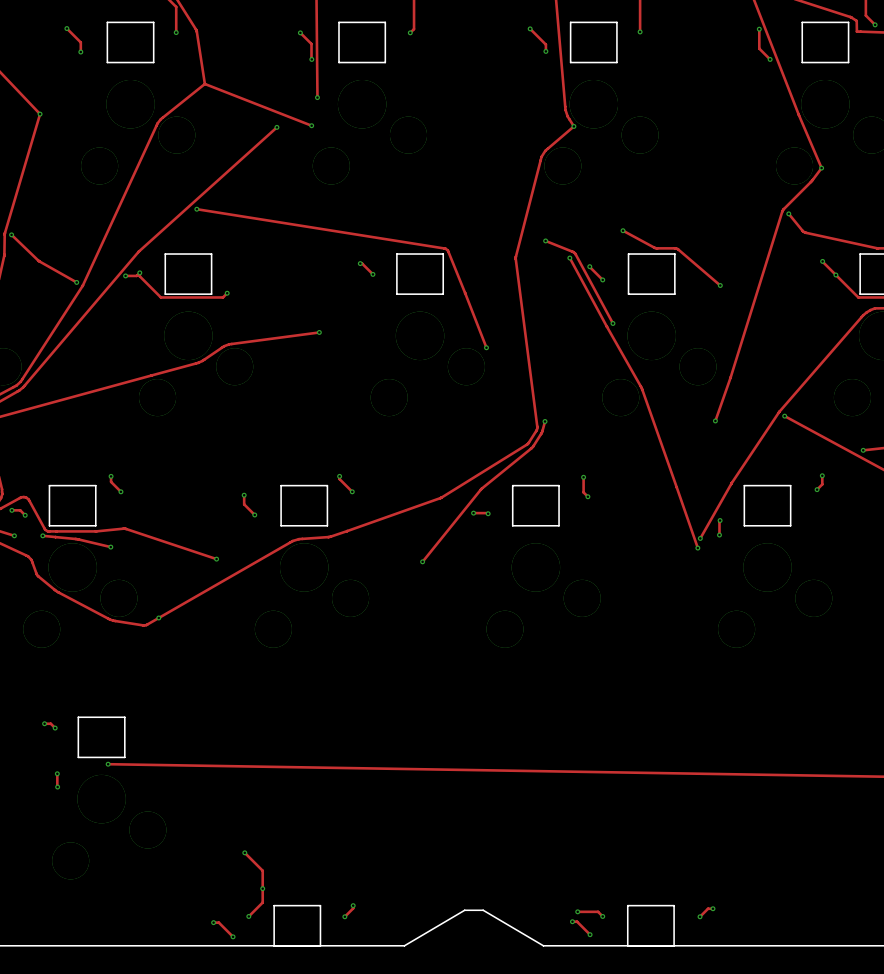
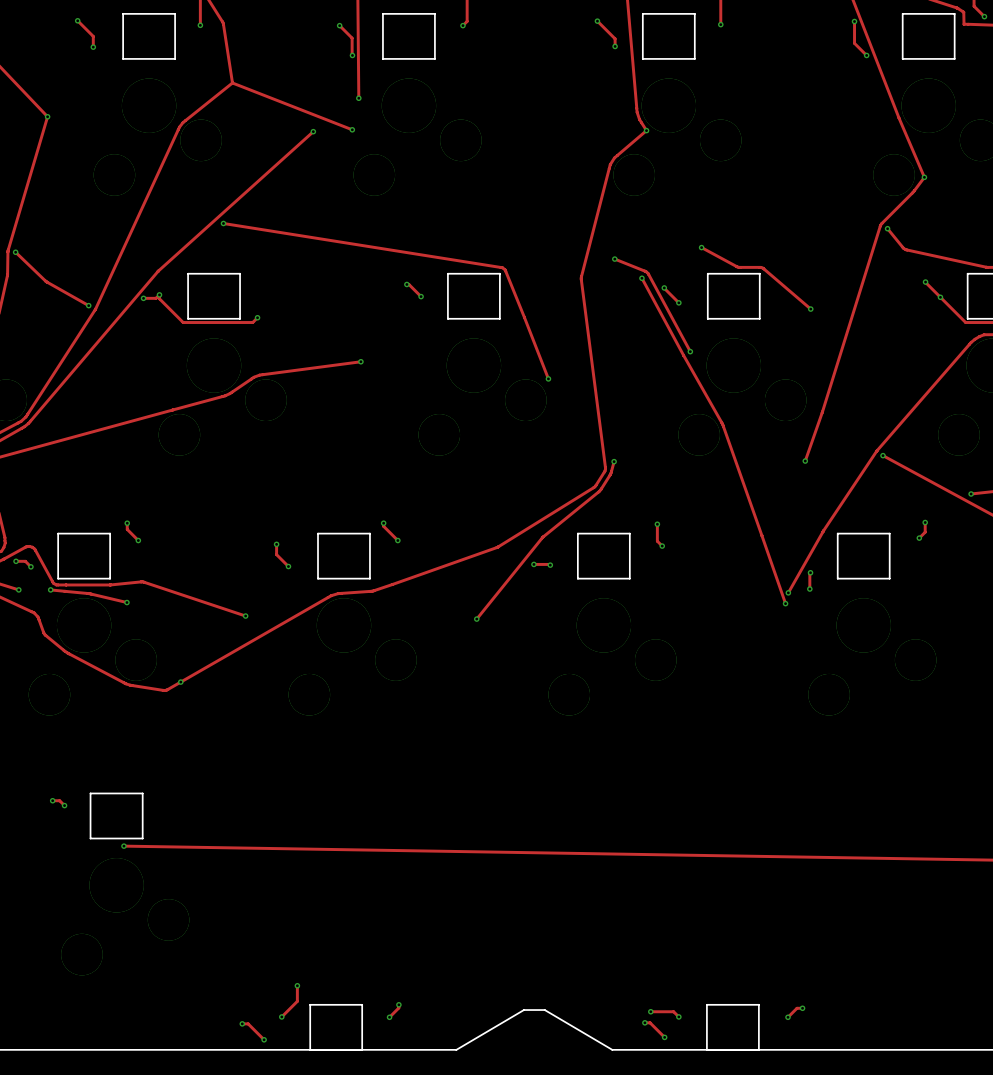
track: (57, 773) (57, 787) -> none
via: (57, 773) -> none
via: (57, 787) -> none
track: (244, 852) (262, 870) (262, 888) -> none
via: (244, 852) -> none

